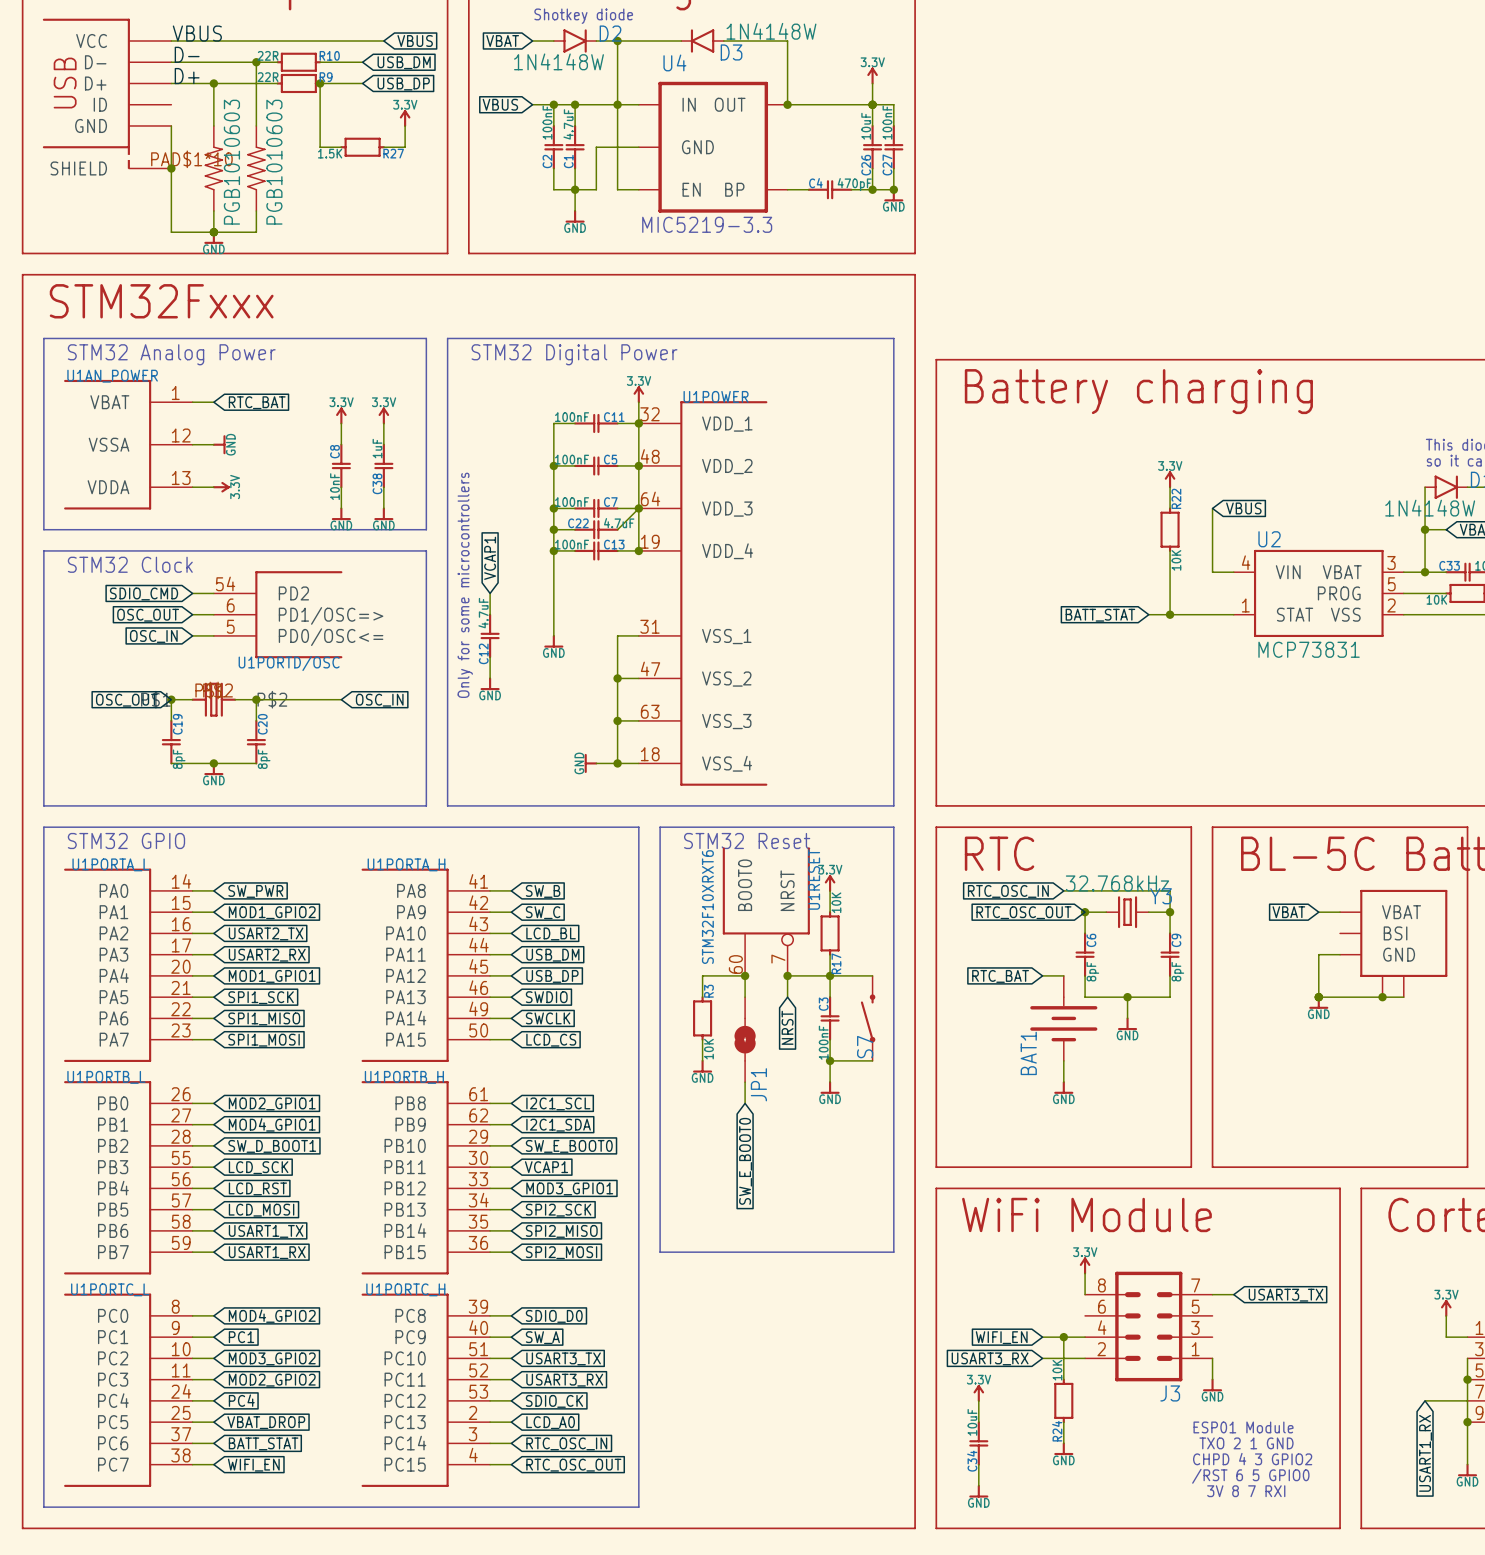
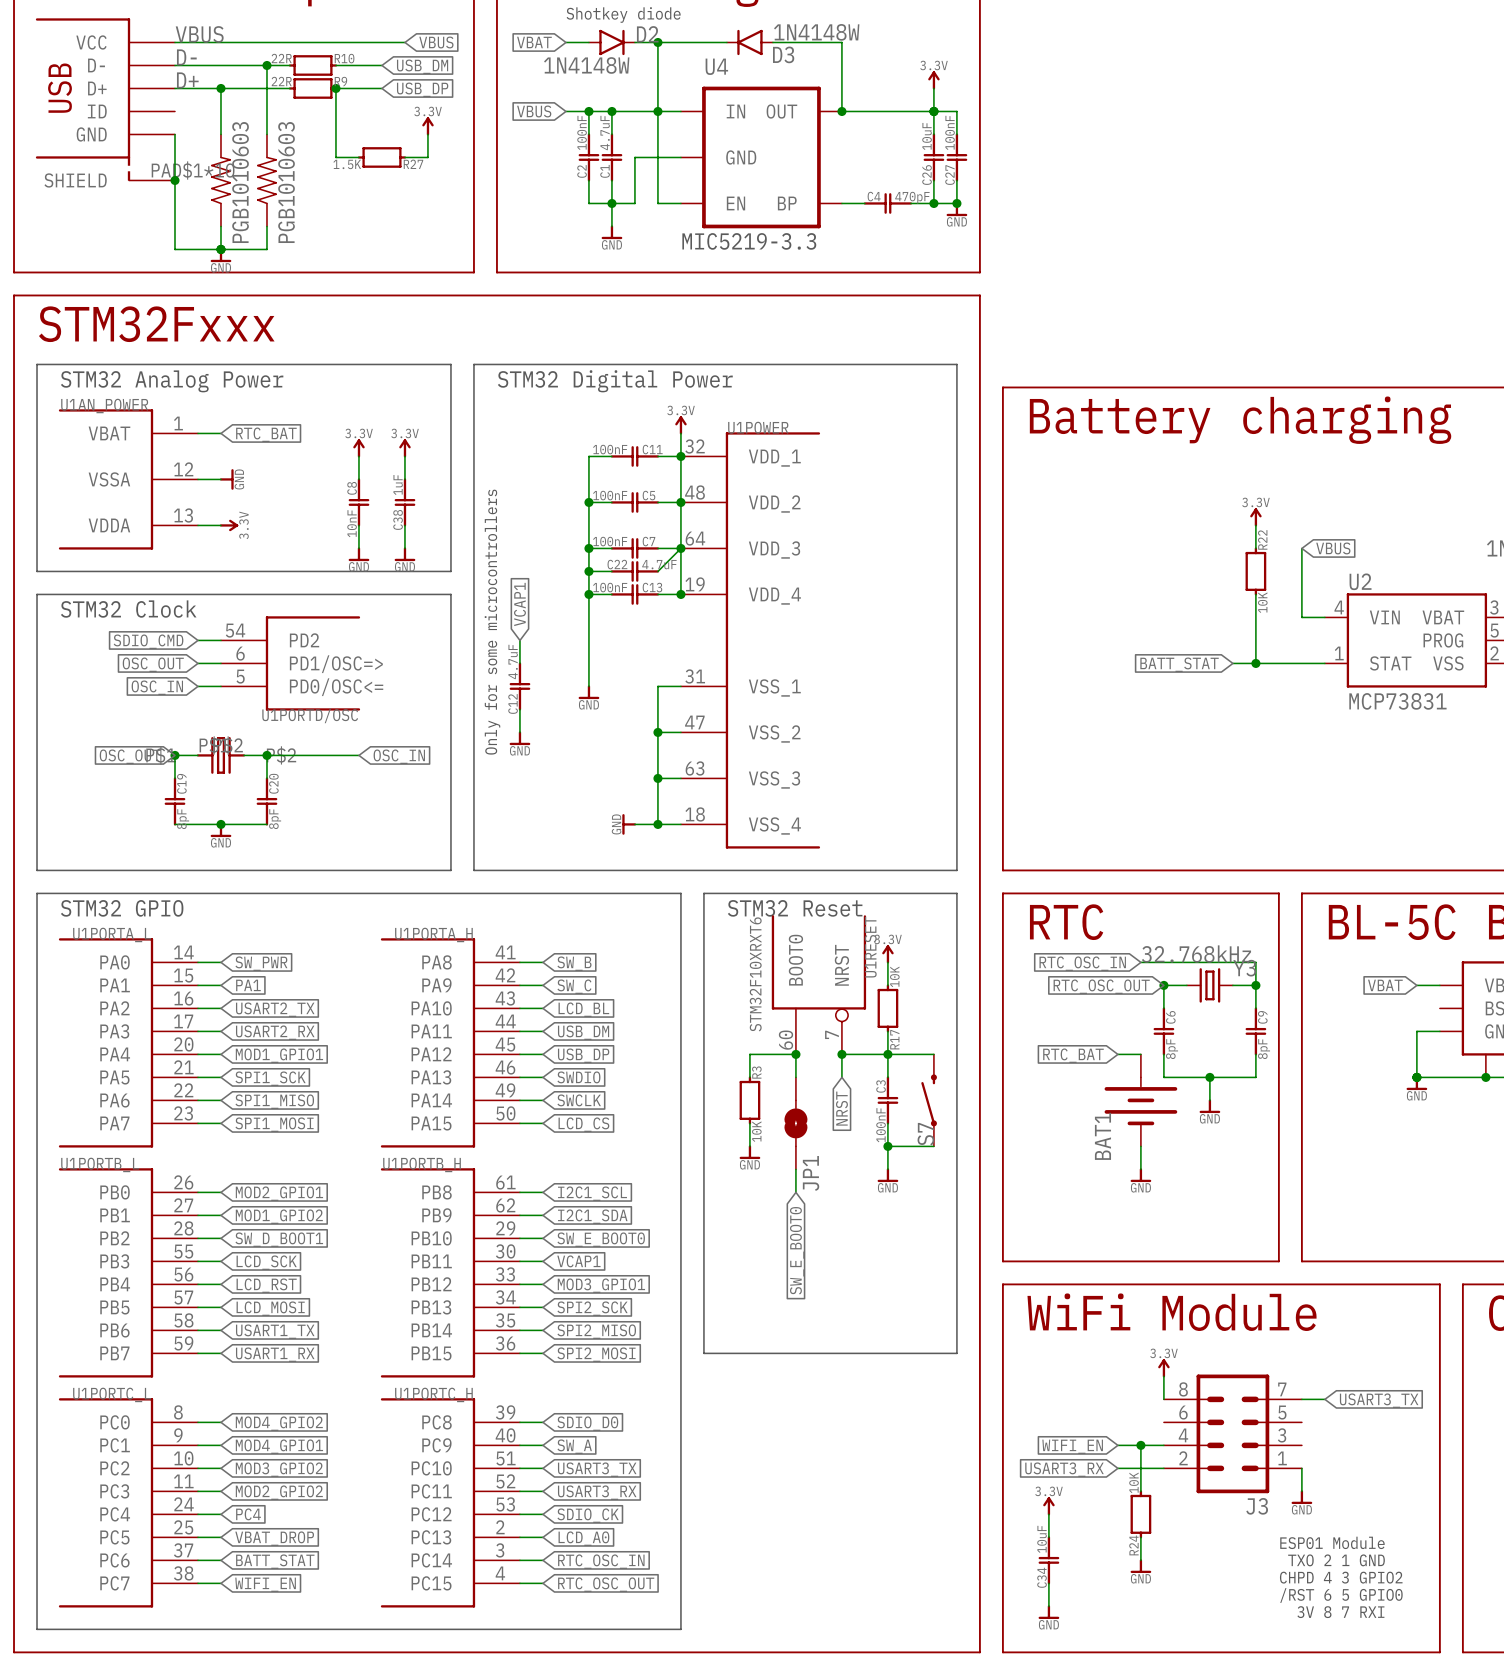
global label: MOD1_GPIO2 (272, 912) -> PA1 (248, 985)
global label: MOD4_GPIO1 (272, 1124) -> MOD1_GPIO2 (279, 1216)
global label: PC1 (241, 1337) -> MOD4_GPIO1 (279, 1446)

